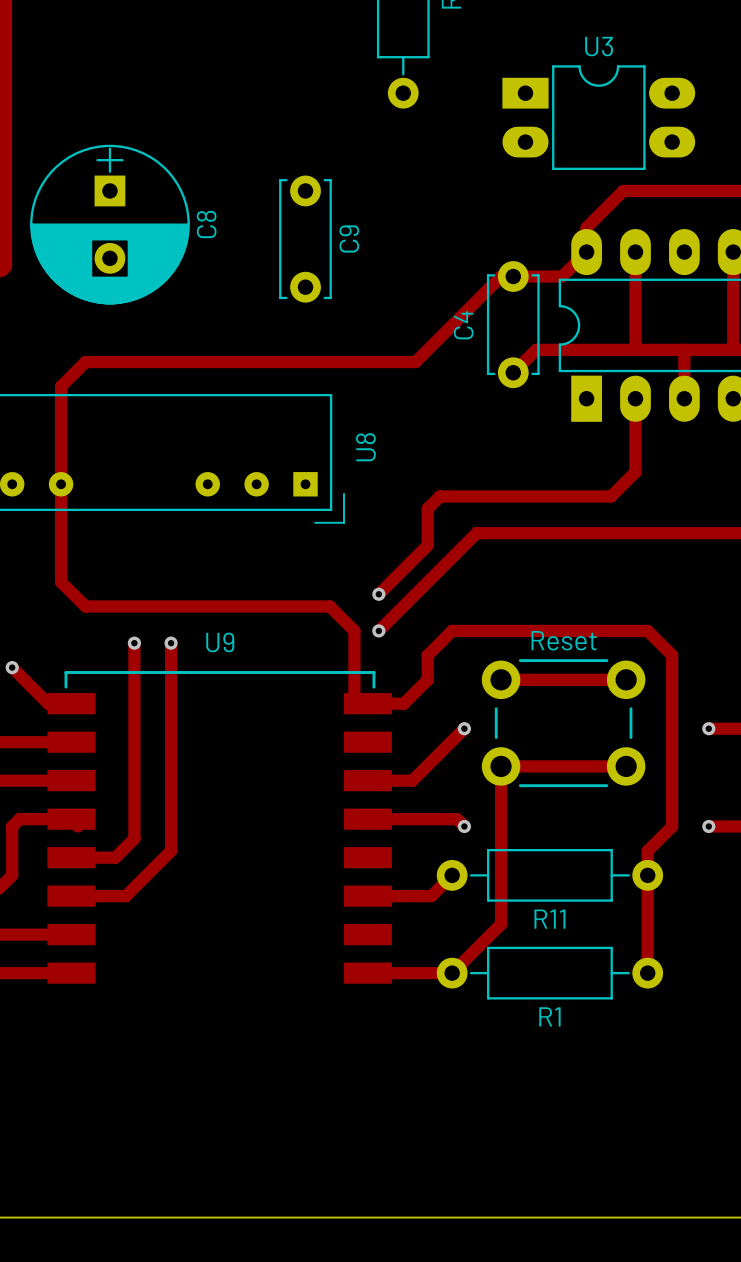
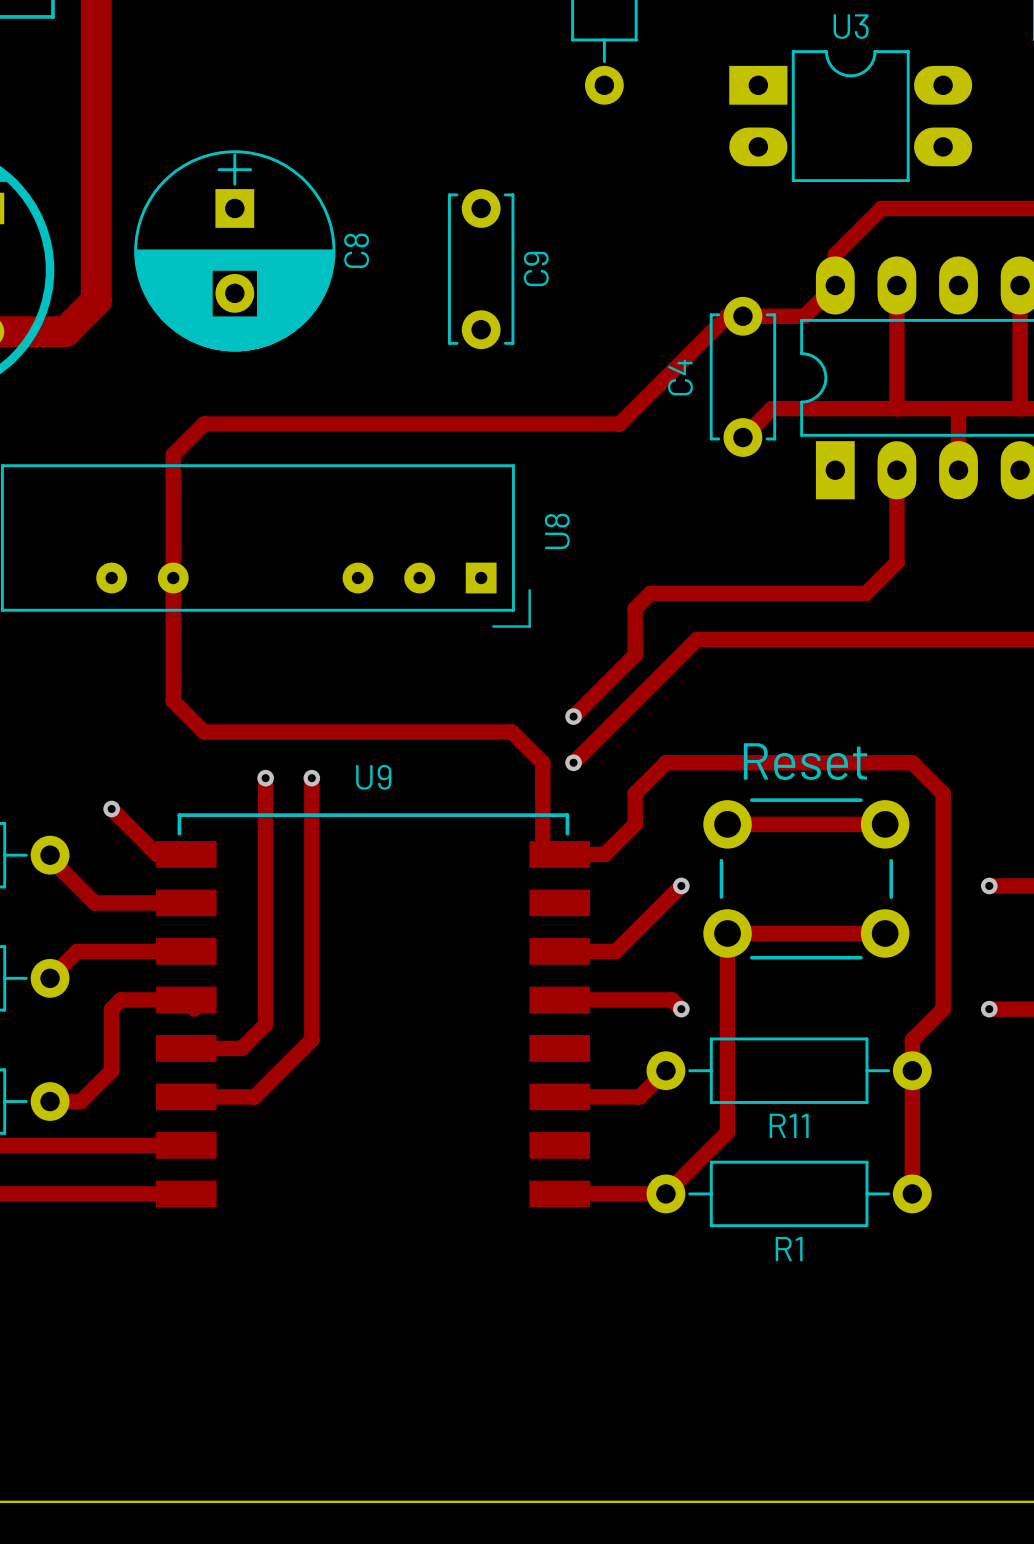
text: none -> Reset (805, 761)
Reset name: Reset (564, 640) -> none

